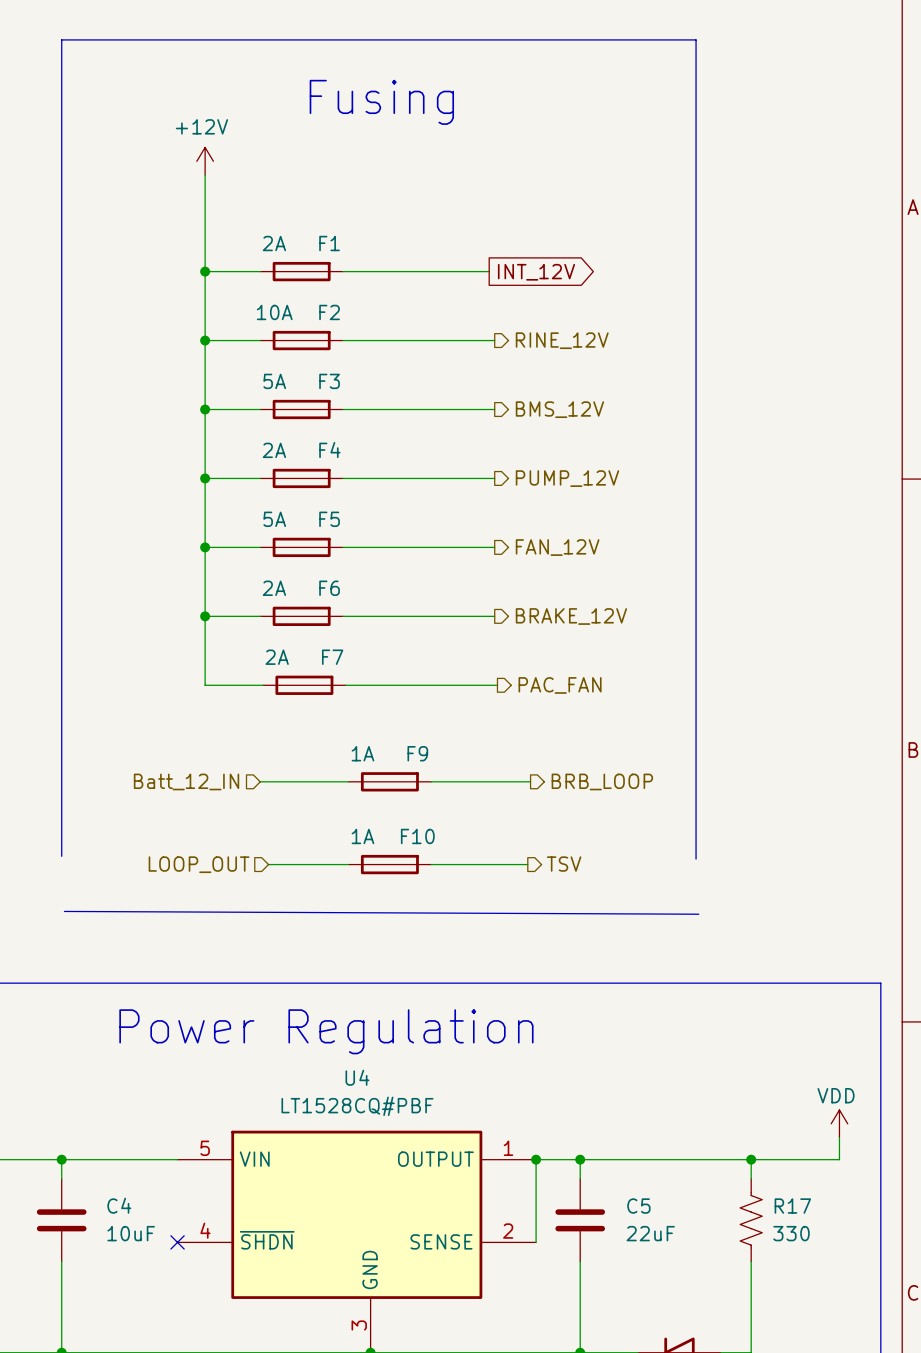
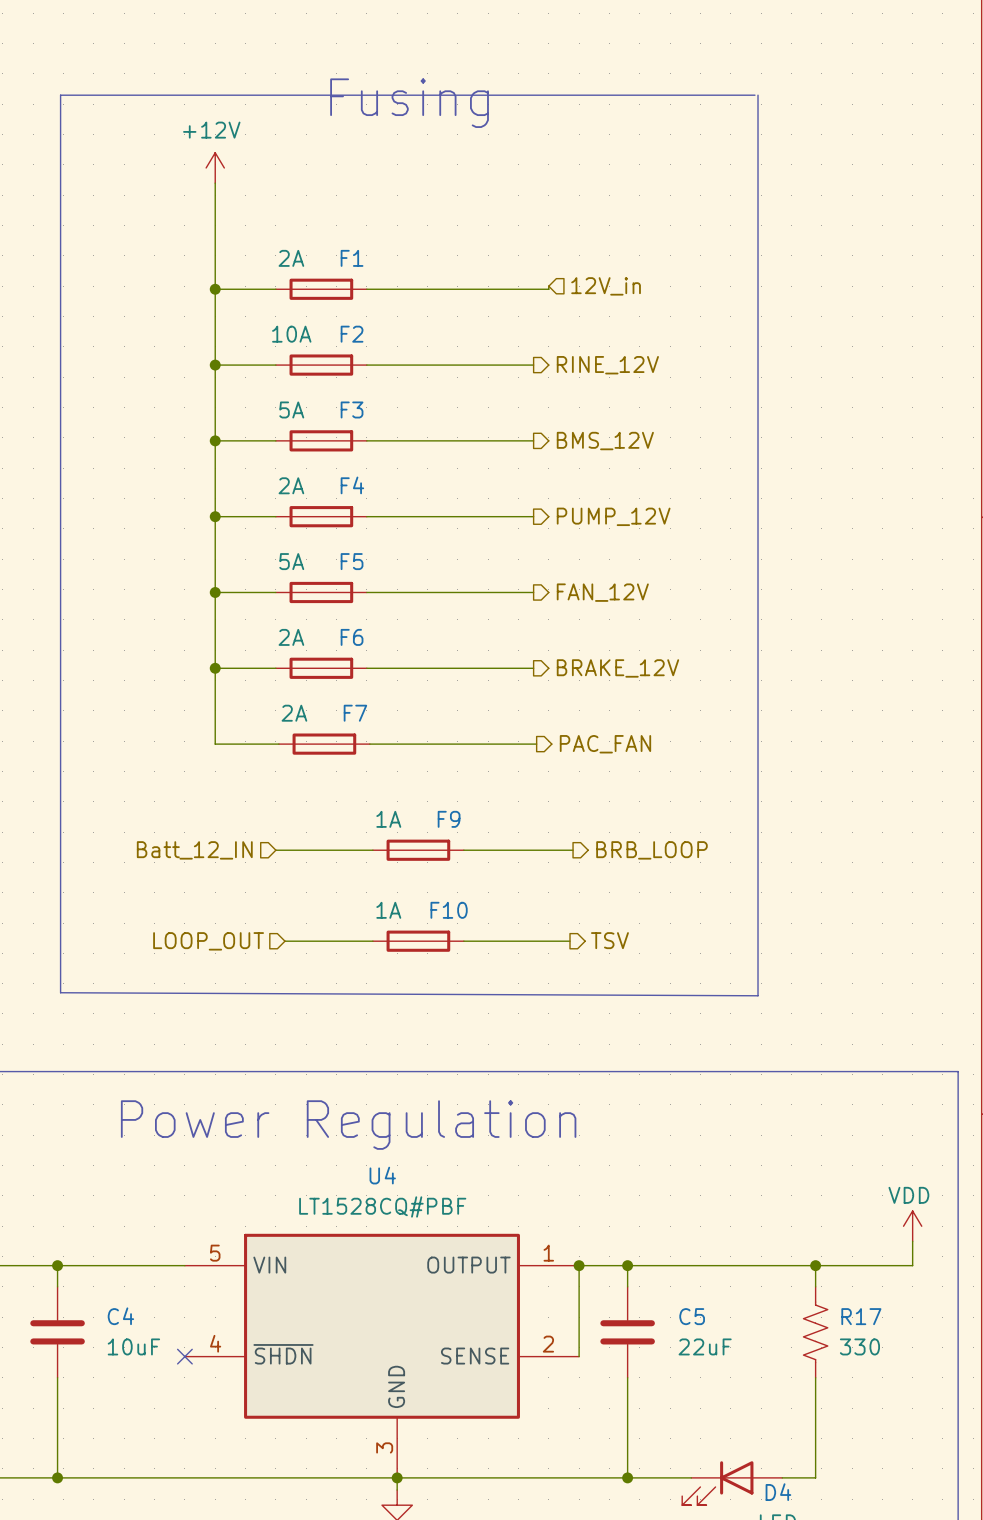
line: none -> (754, 95) (60, 95) (60, 992)
line: none -> (758, 95) (758, 995)
wire: none -> (548, 286) (548, 289) (527, 289)
hierarchical label: none -> 12V_in (606, 286)
global label: INT_12V (536, 272) -> none
line: (61, 856) (61, 39) (696, 39) (696, 859) -> none

